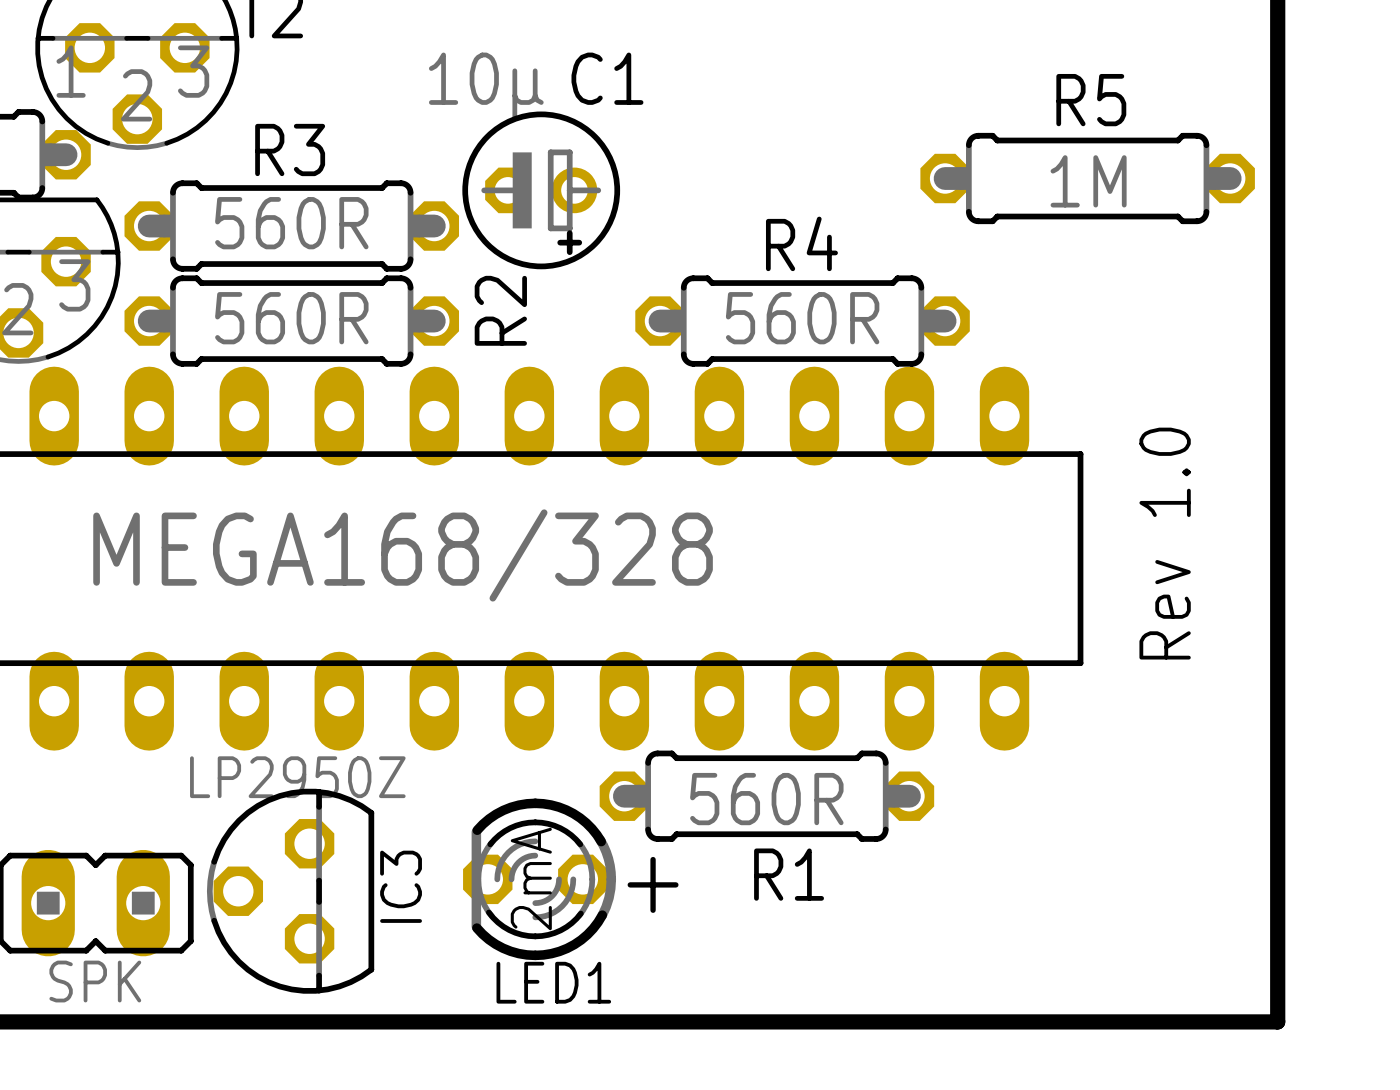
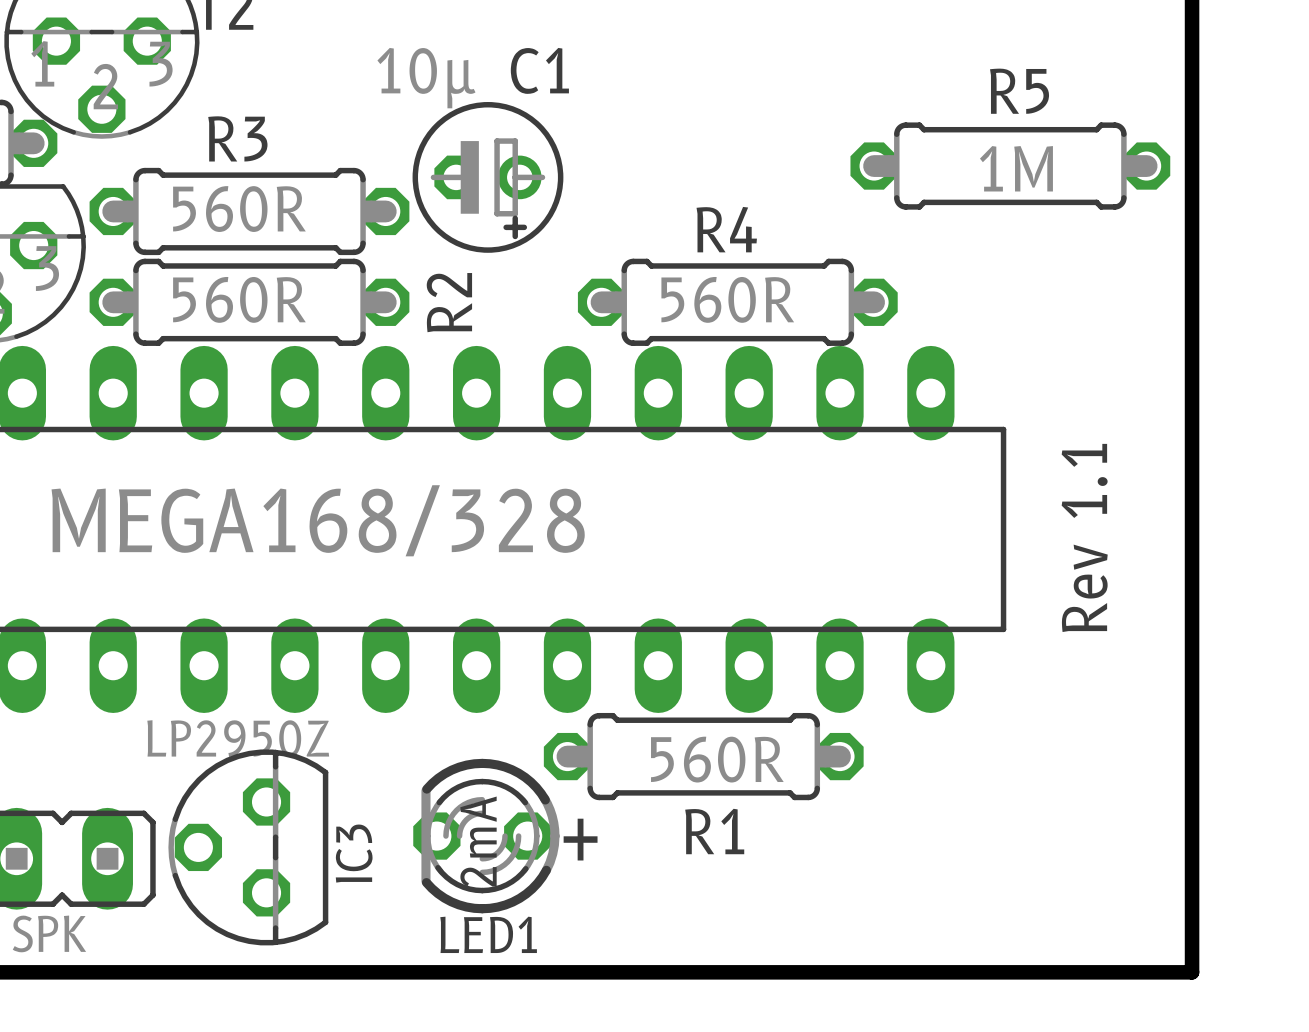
text: Rev 1.0 (1165, 543) -> Rev 1.1 (1084, 537)

